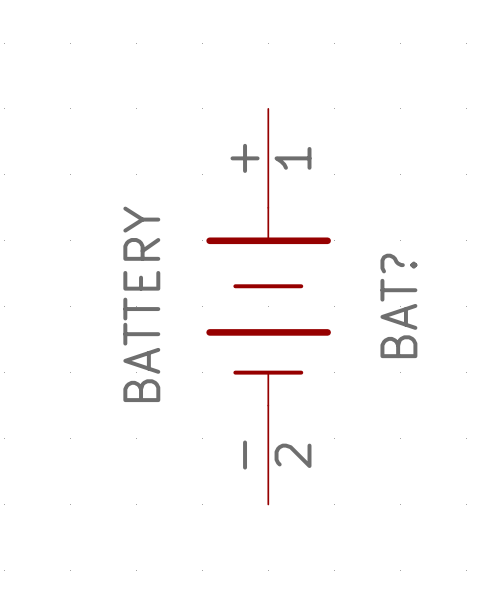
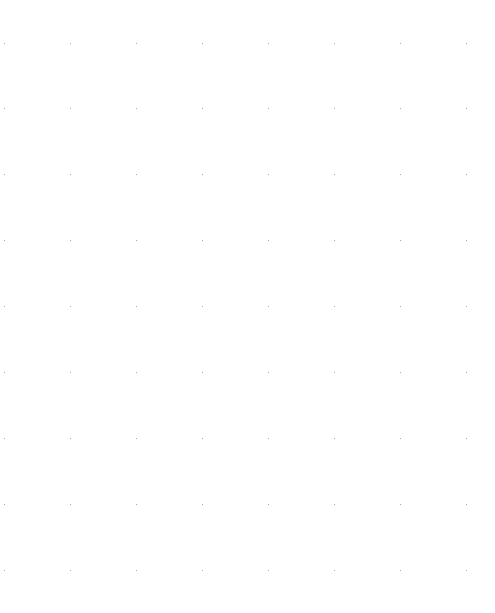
BAT?: BATTERY (268, 306) -> none

